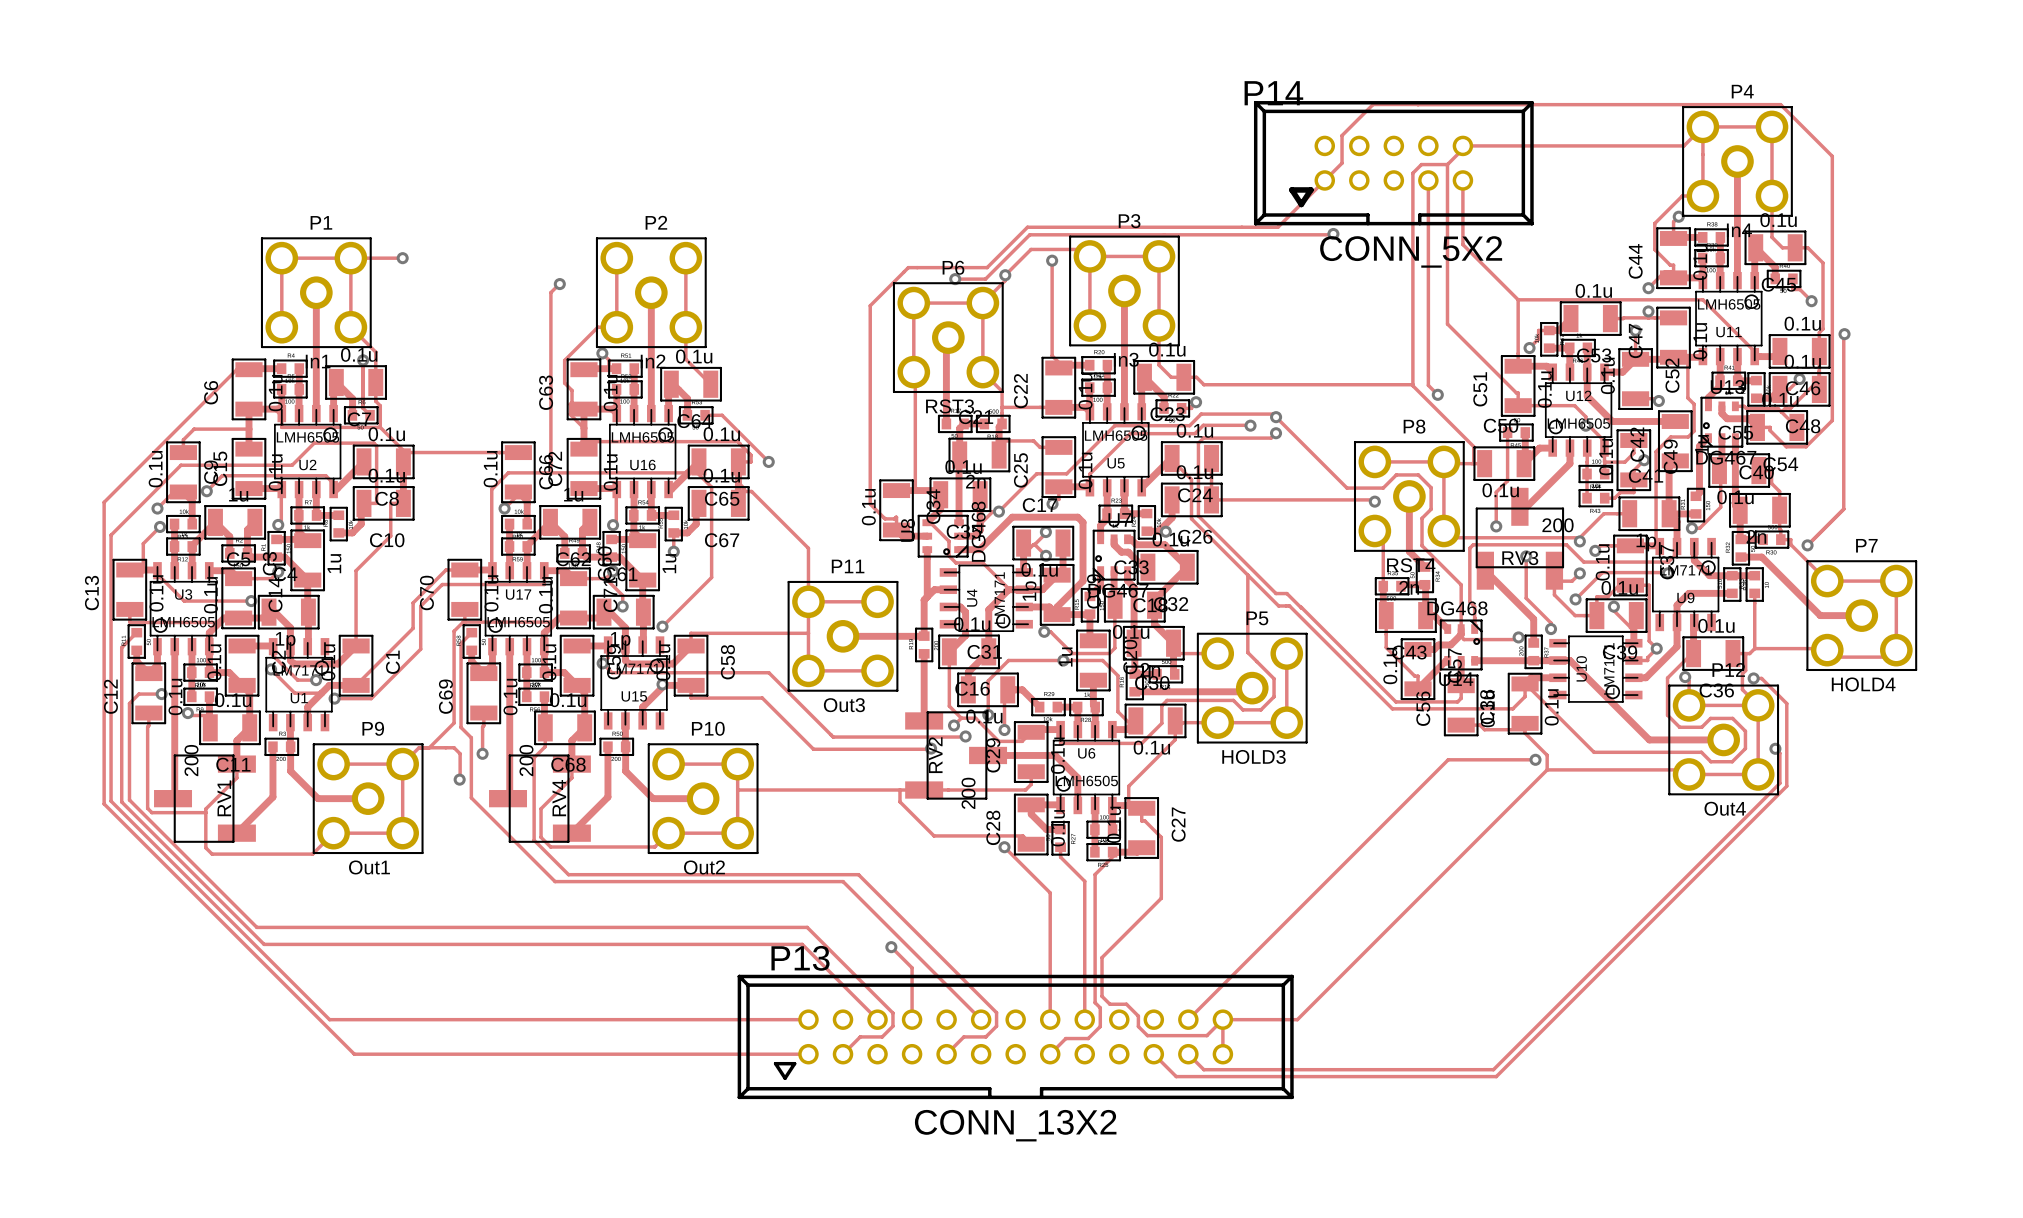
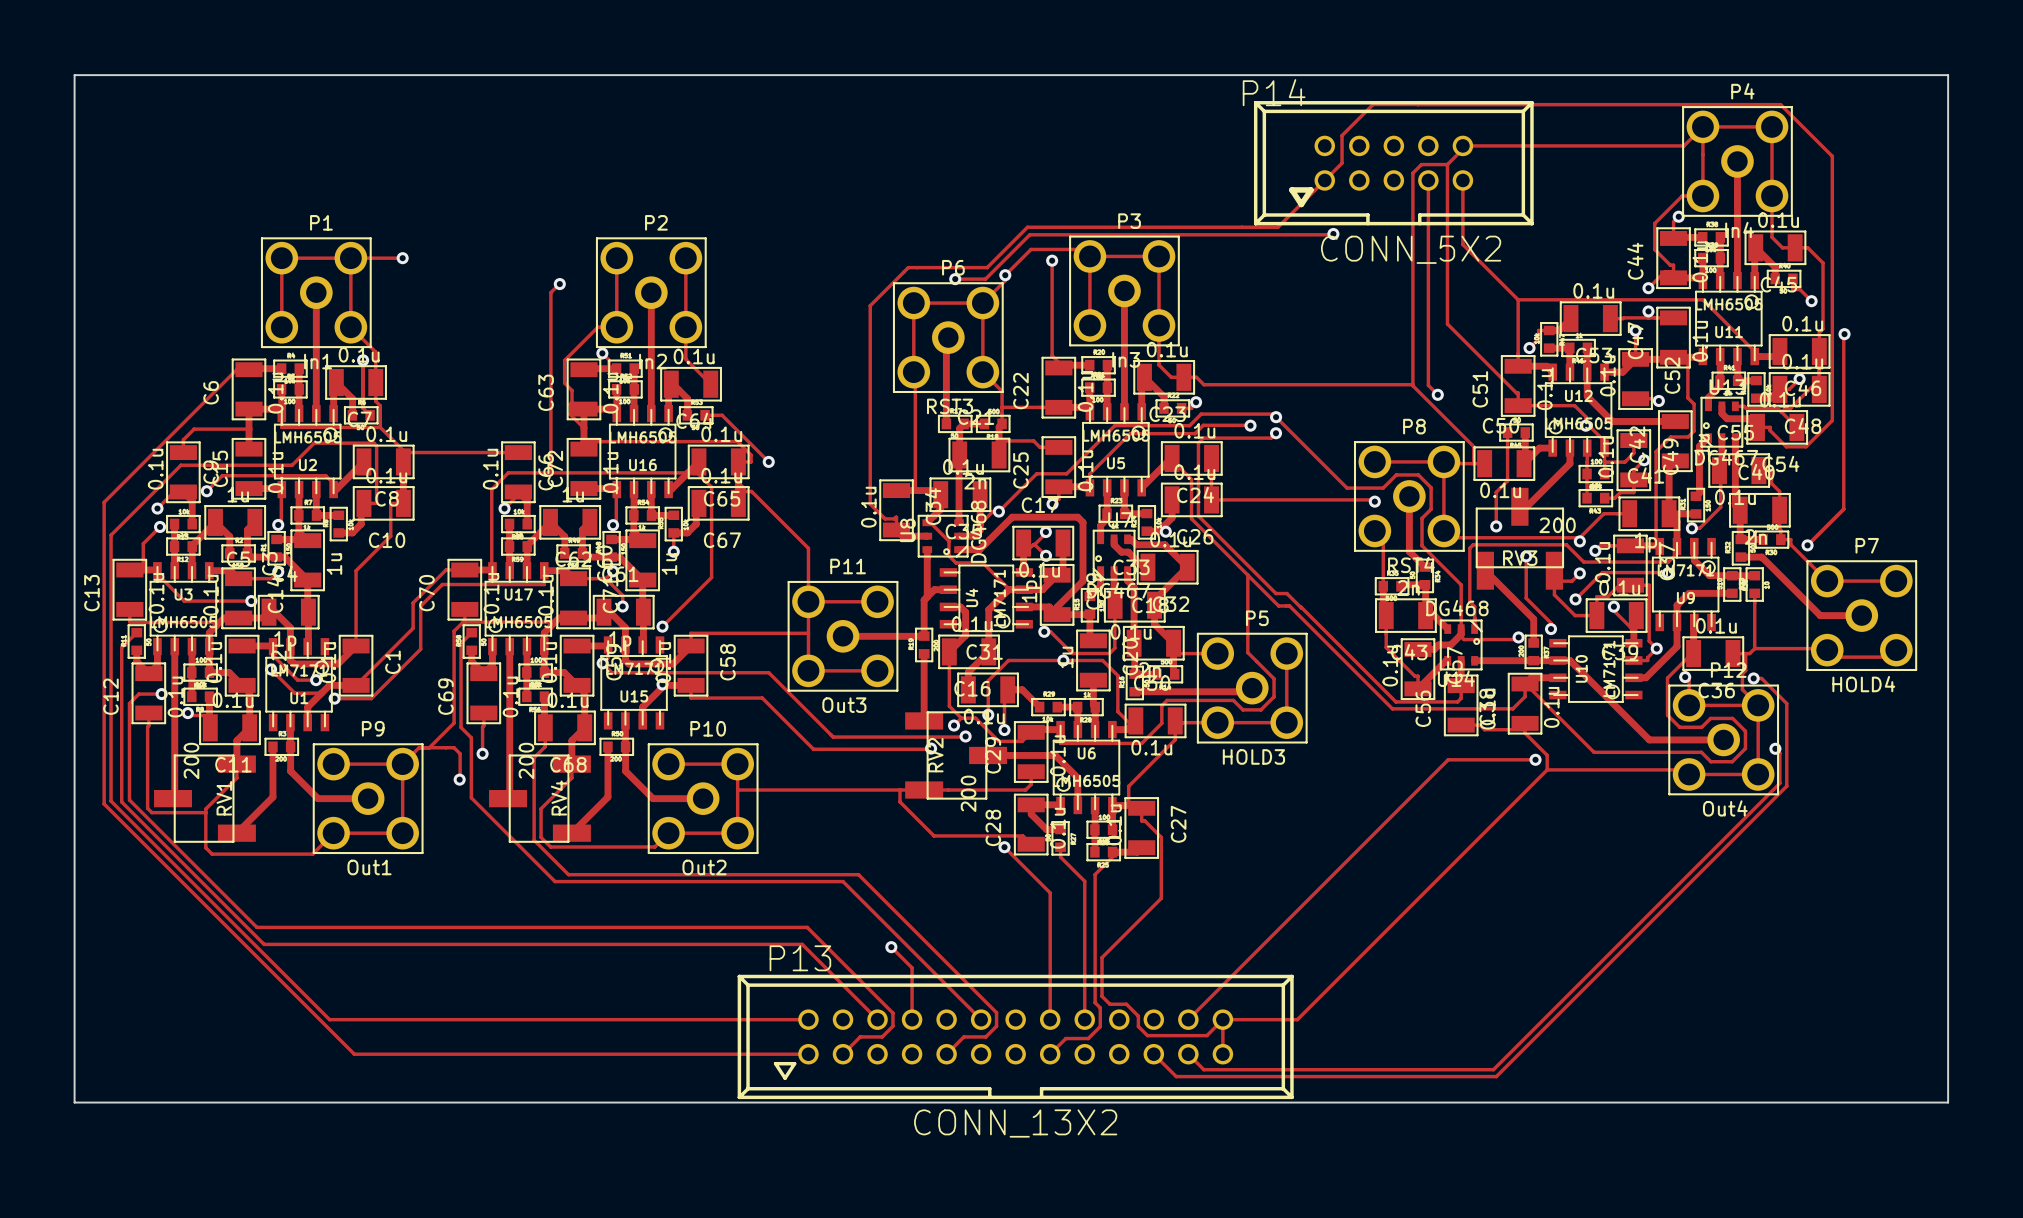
board edge: none -> (74, 75) (74, 1102) (1948, 1102) (1948, 75) (74, 75)
track: (1896, 581) (1896, 650) -> none

